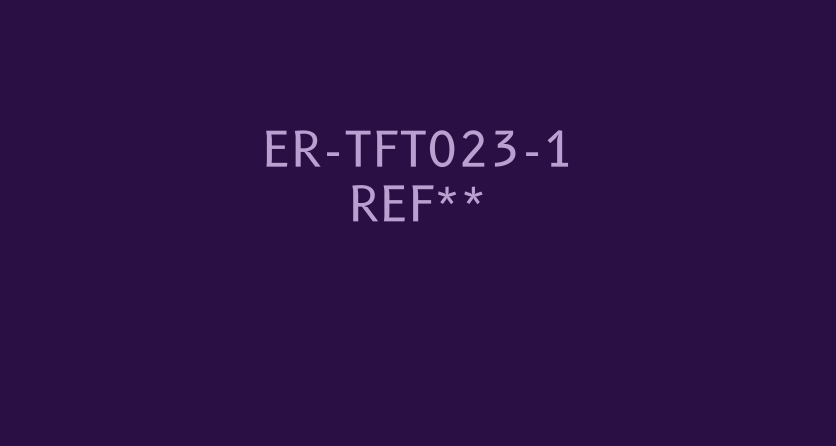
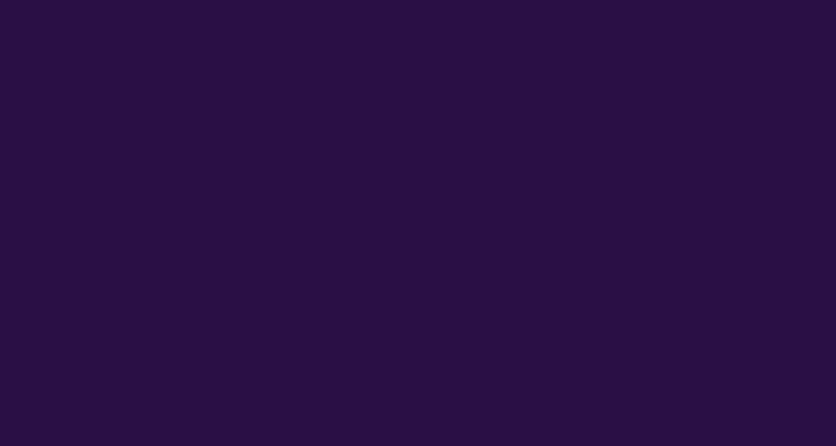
REF**: ER-TFT023-1 (417, 175) -> none

